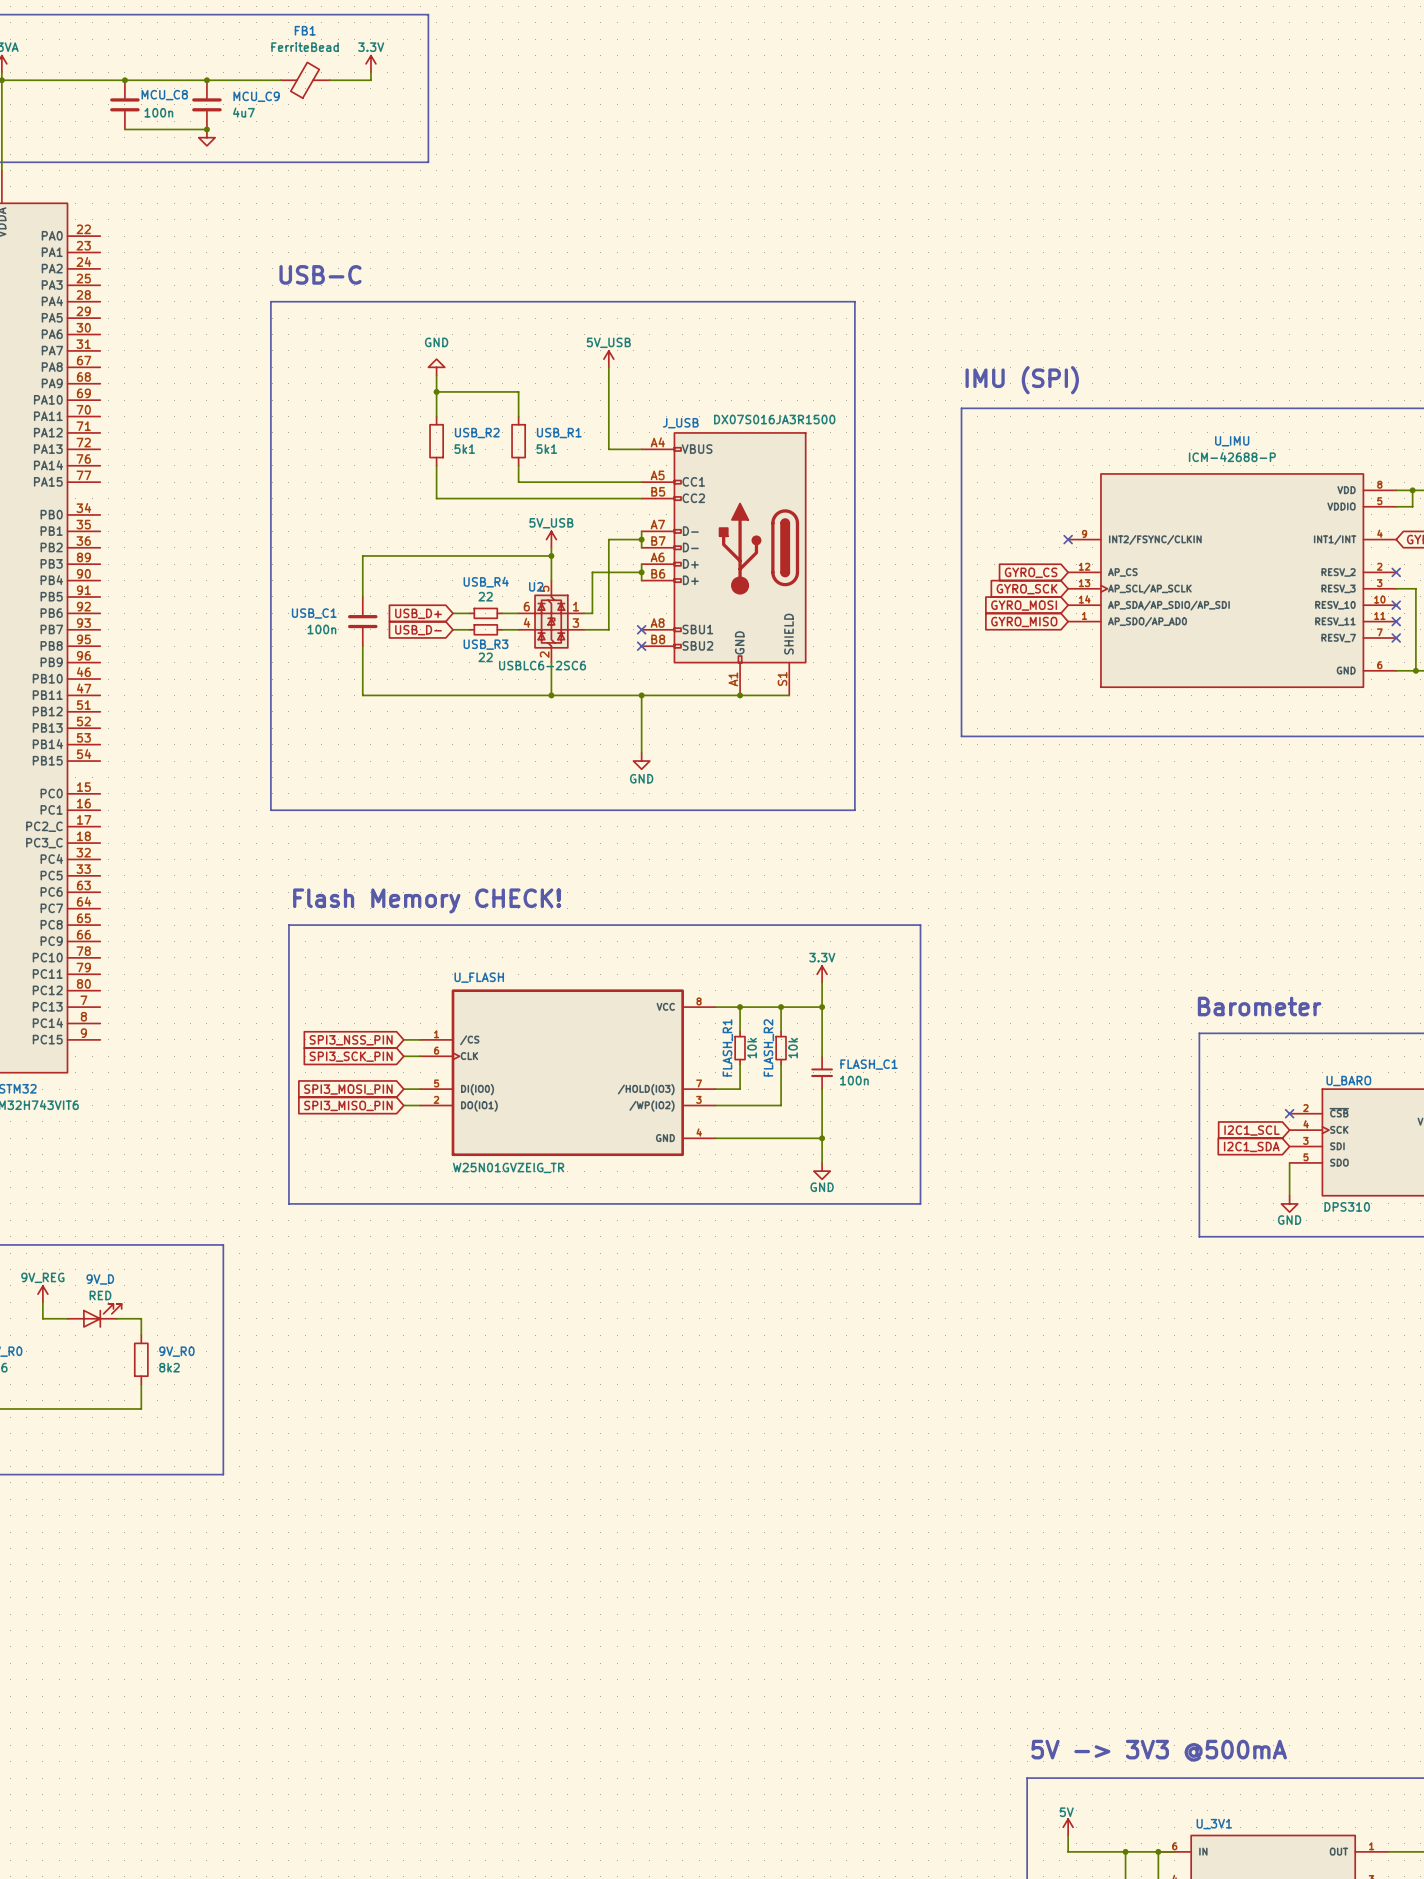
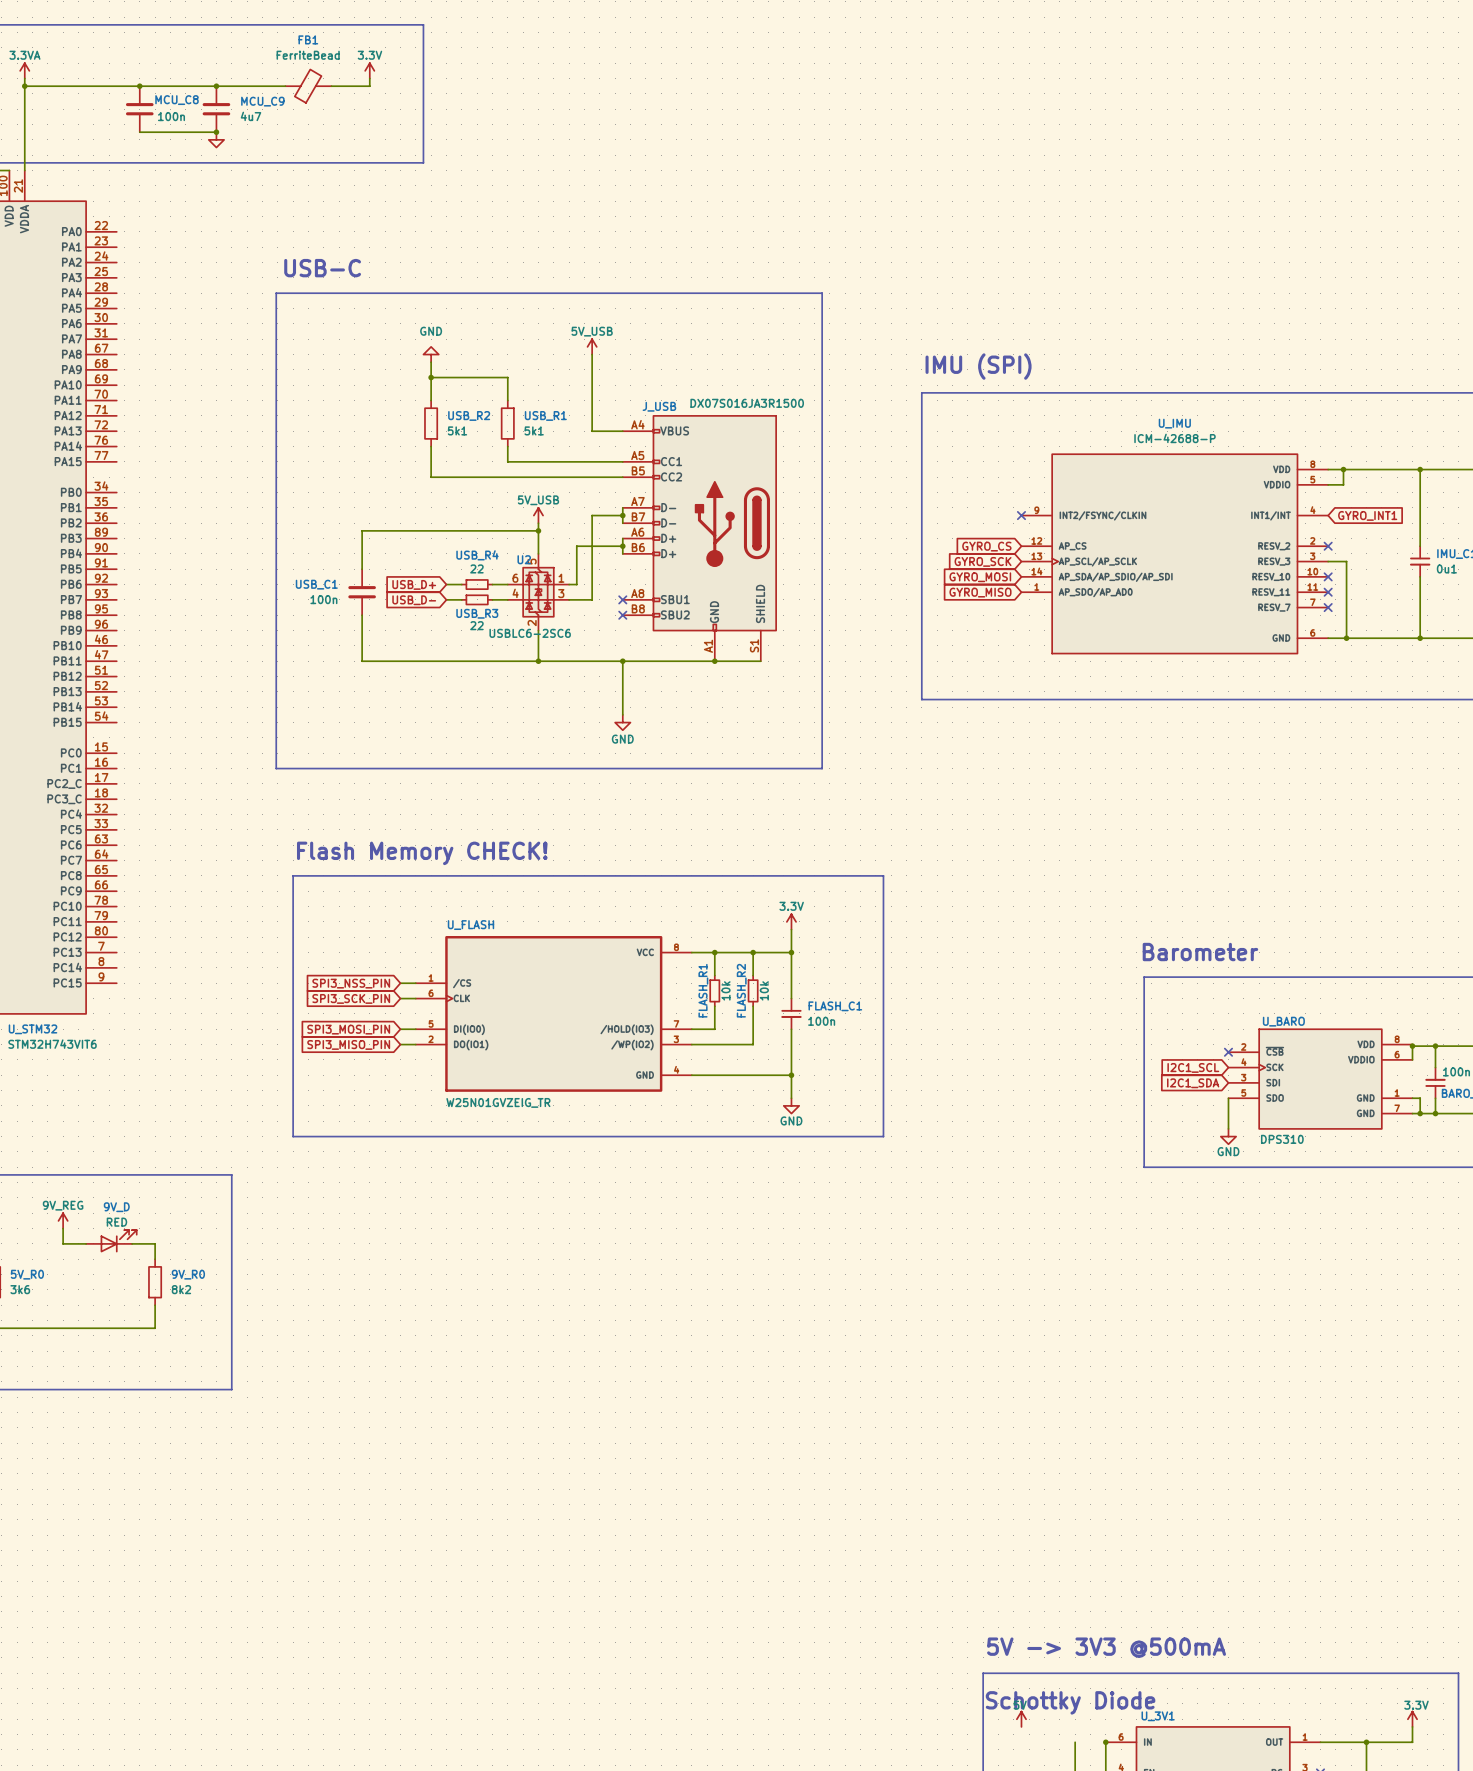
text: none -> Schottky Diode (1070, 1702)
wire: (1068, 1835) (1068, 1851) (1174, 1851) -> none
junction: (1125, 1851) -> none

